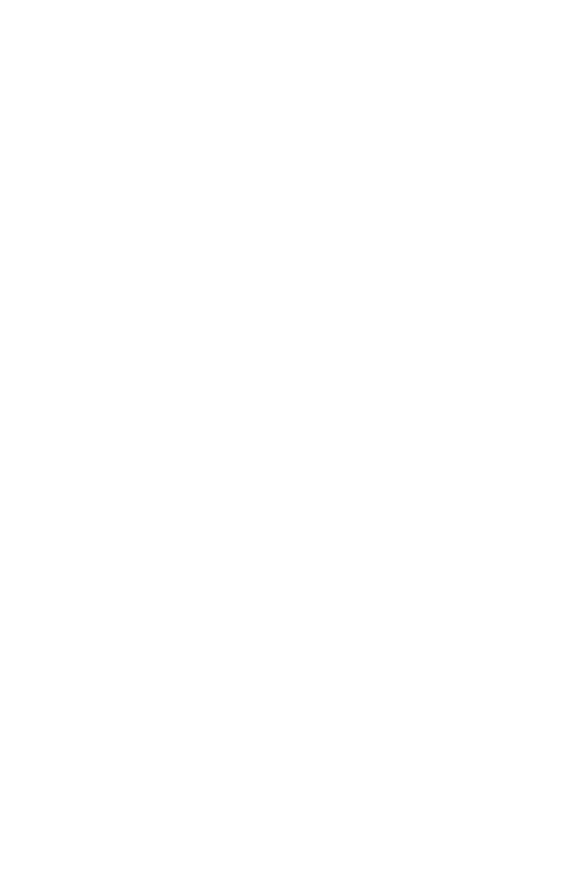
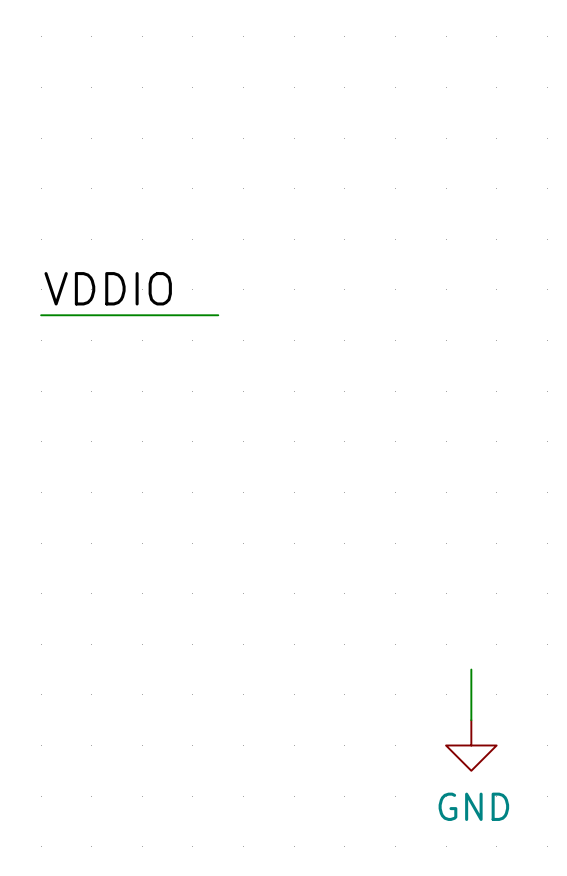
label: none -> VDDIO (108, 288)
wire: none -> (41, 315) (218, 315)
wire: none -> (471, 669) (471, 720)
power symbol: none -> GND (471, 745)

